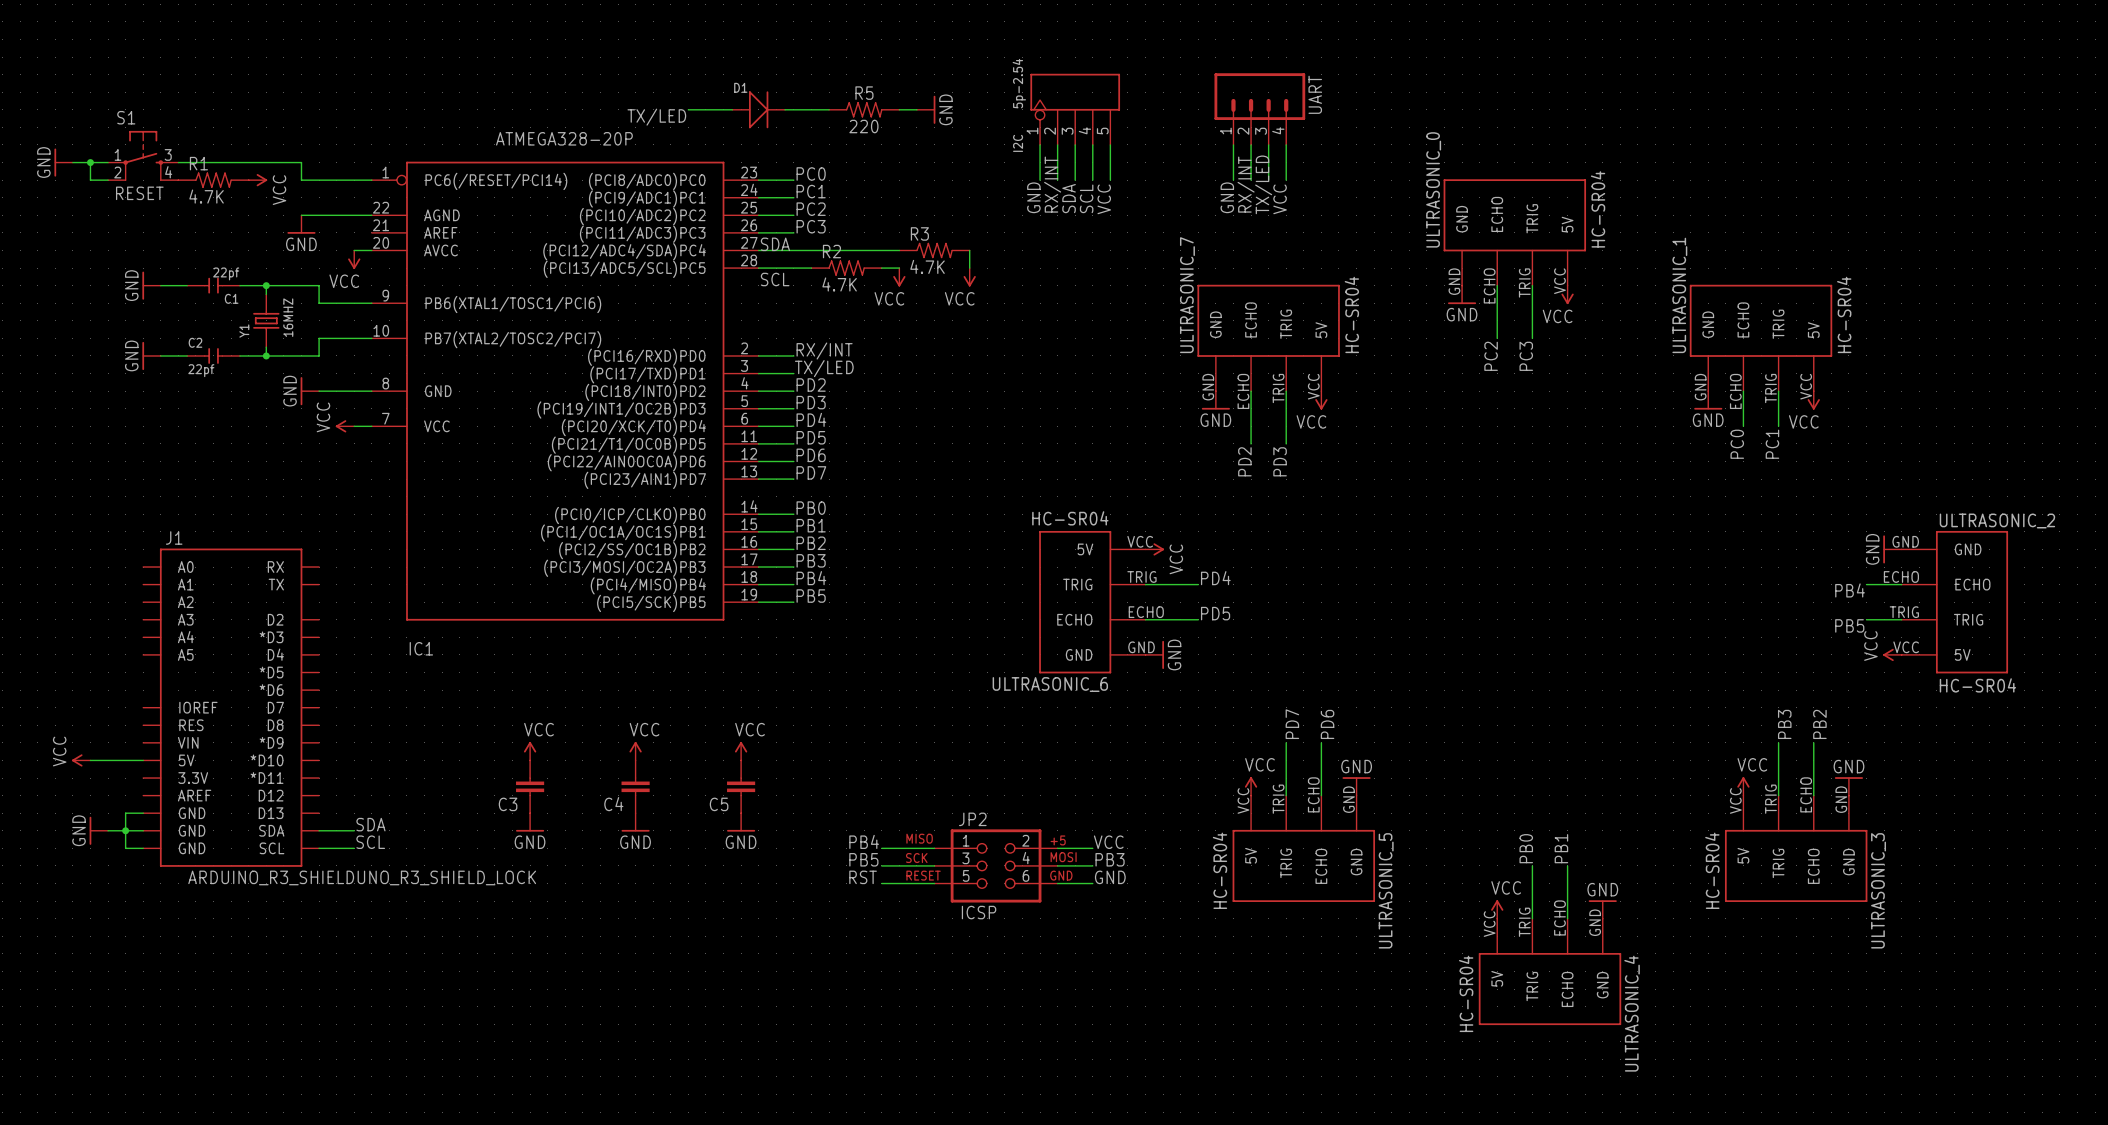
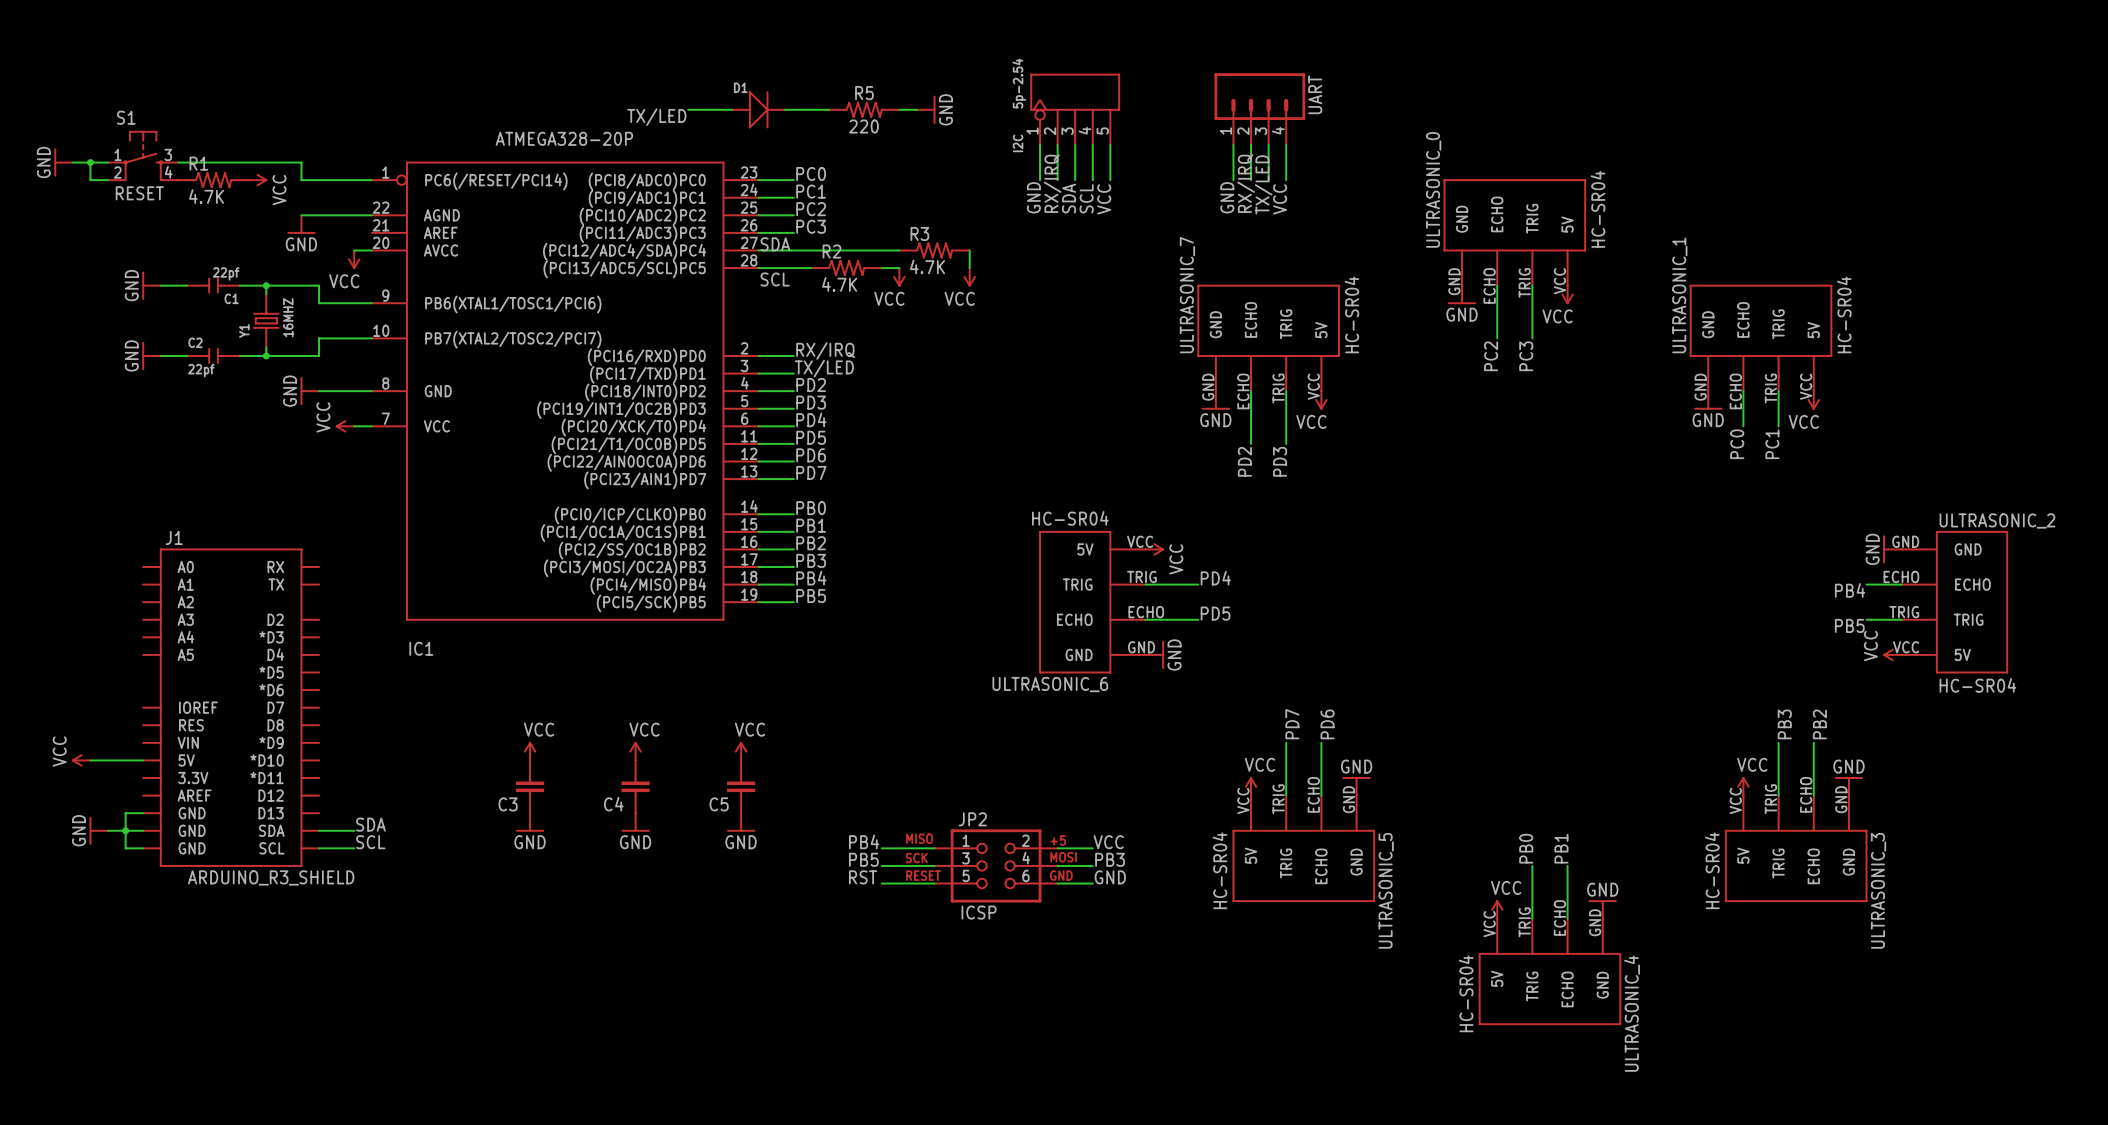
label: RX/INT (1052, 184) -> RX/IRQ (1052, 183)
label: RX/INT (1246, 184) -> RX/IRQ (1246, 183)
label: RX/INT (824, 351) -> RX/IRQ (825, 351)
J1 value: ARDUINO_R3_SHIELDUNO_R3_SHIELD_LOCK (362, 877) -> ARDUINO_R3_SHIELD (271, 877)

